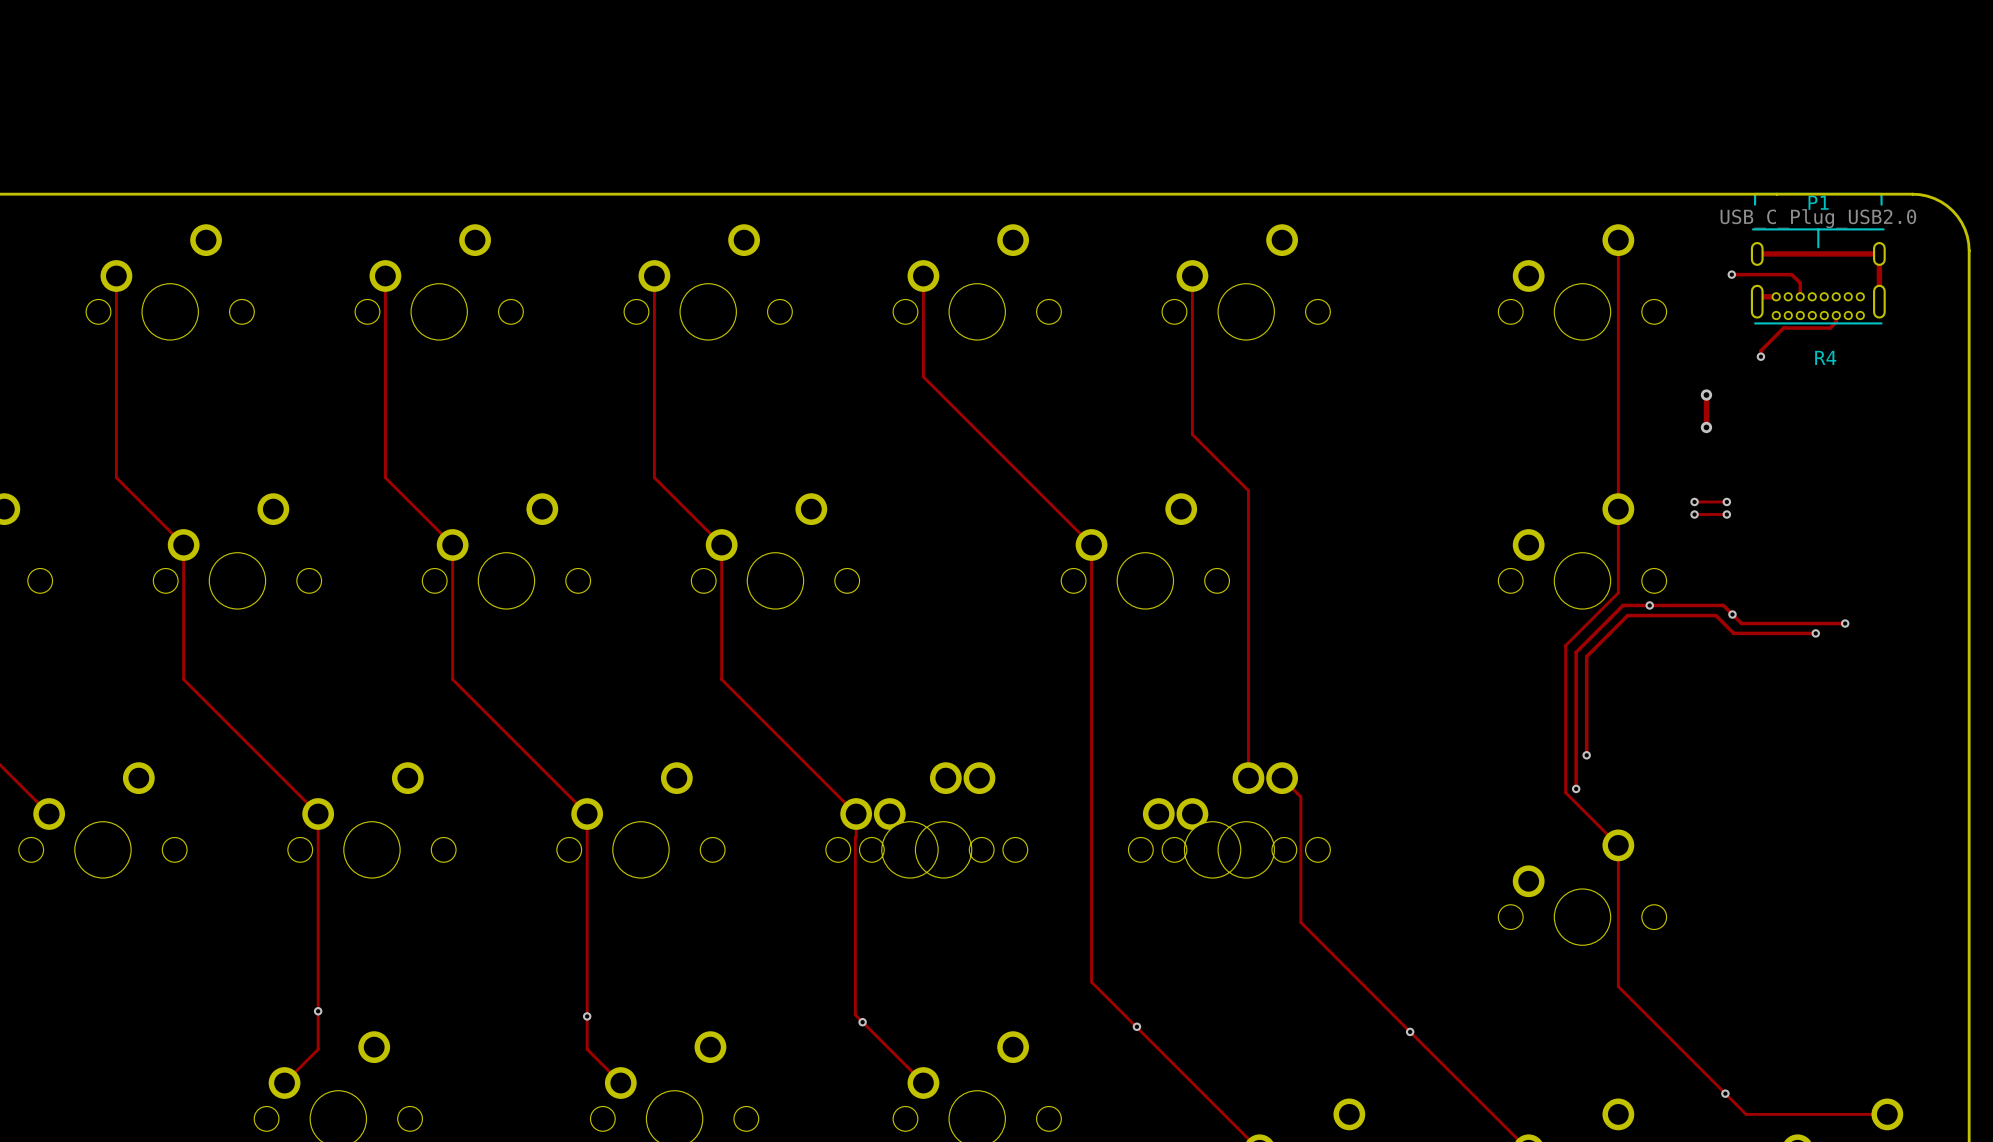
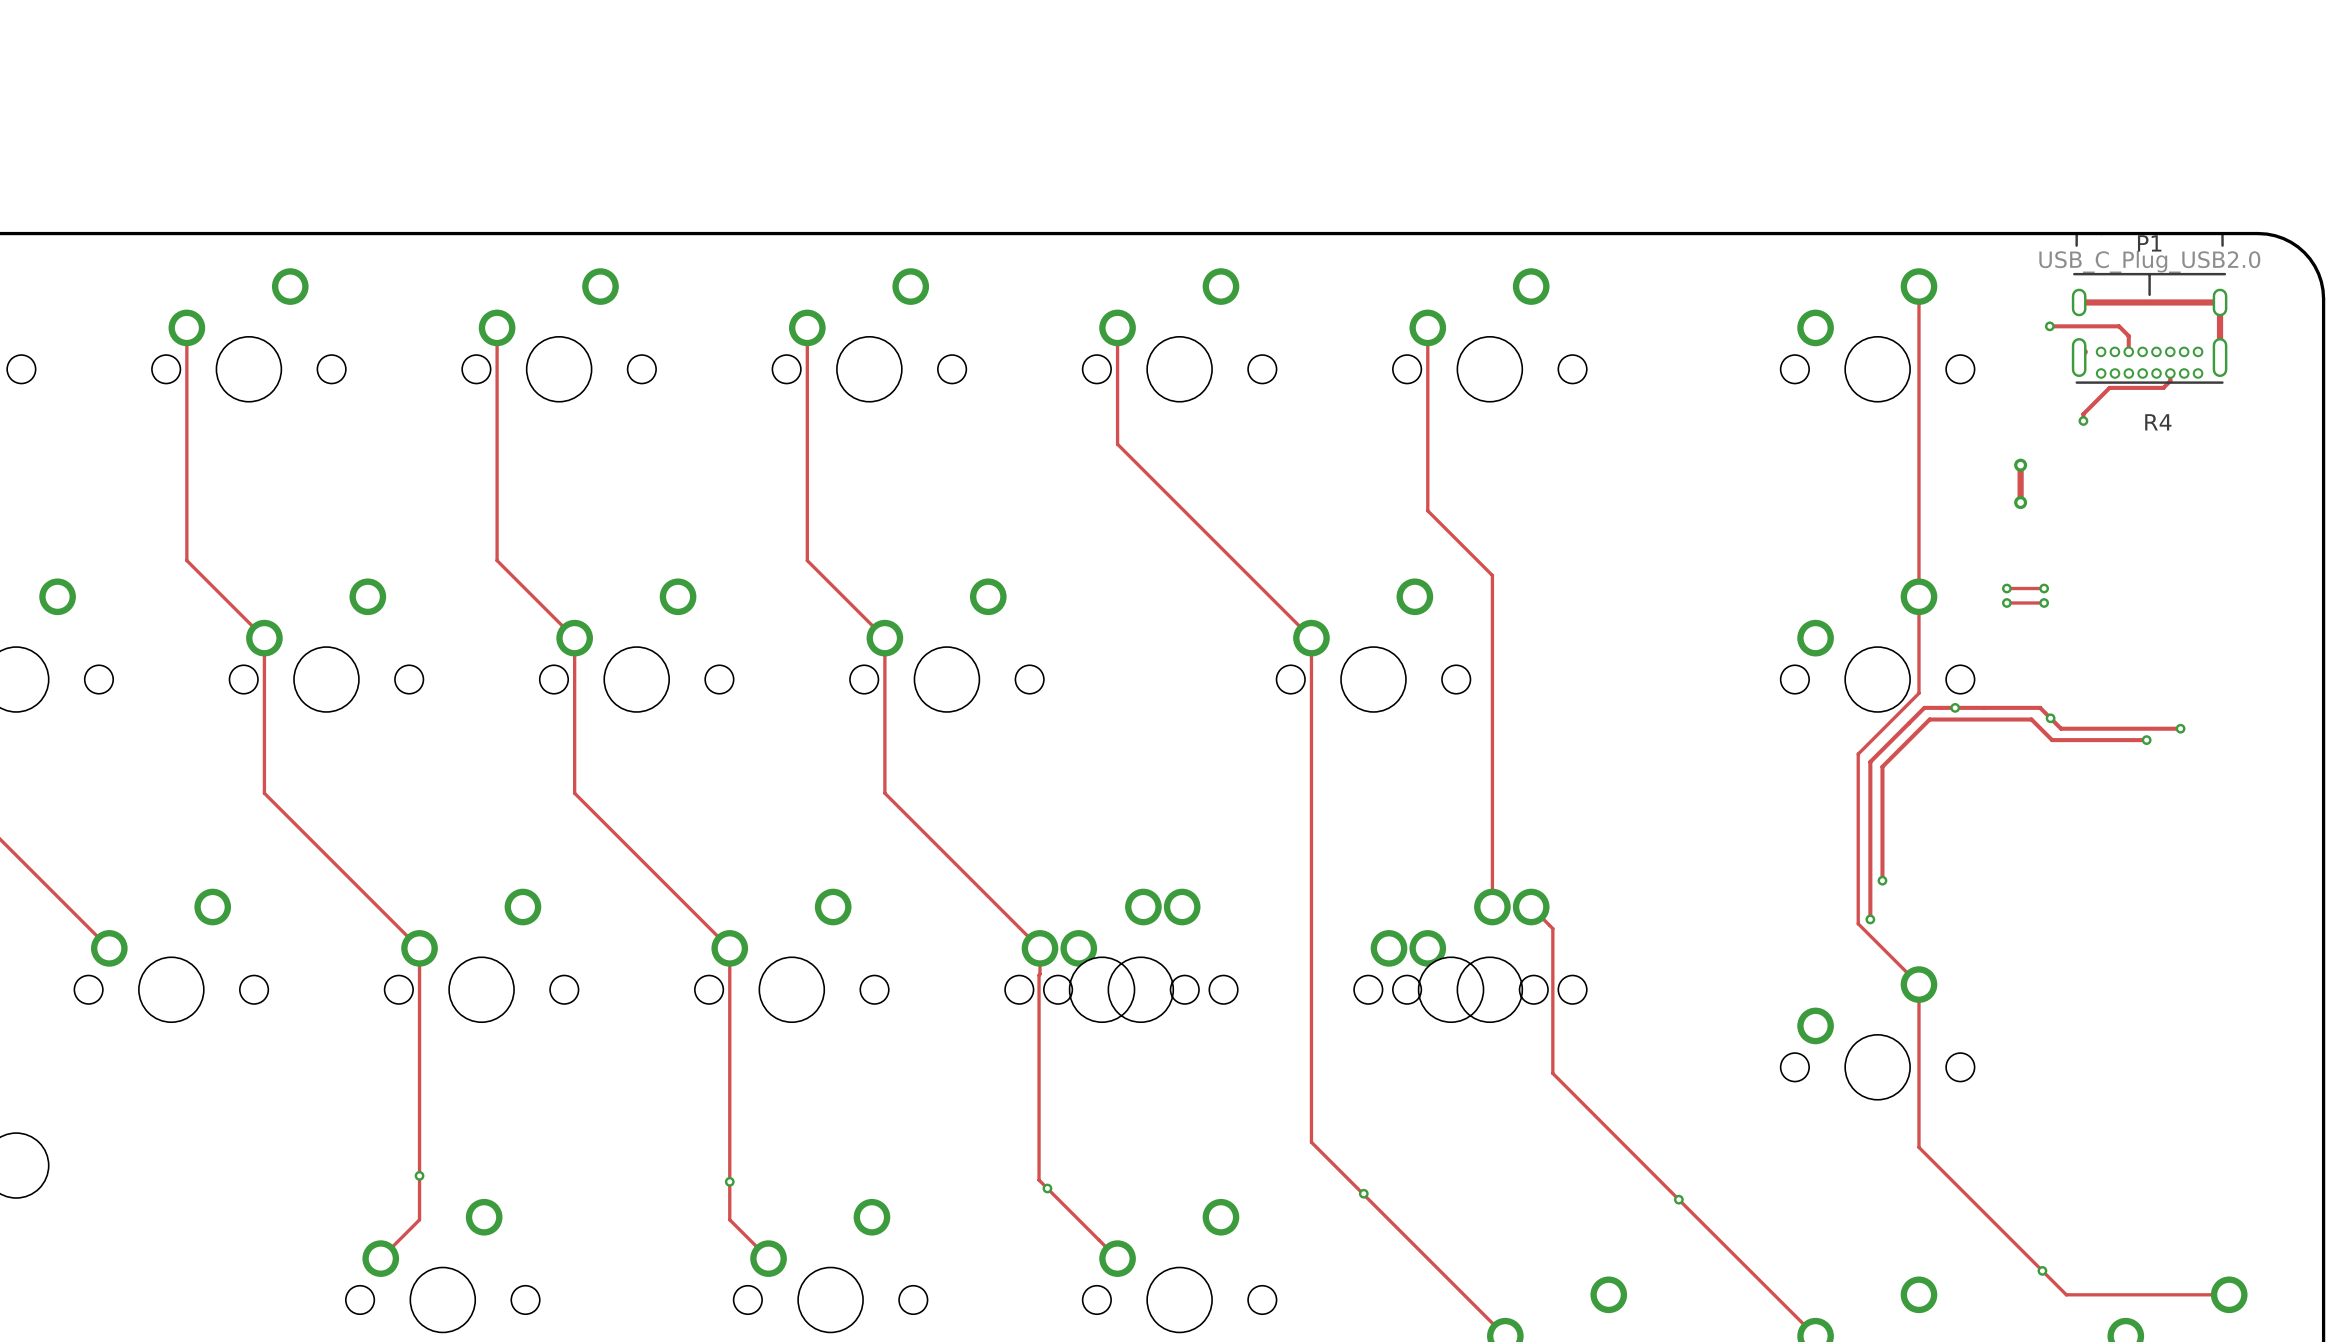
track: (1762, 296) (1776, 296) -> none

